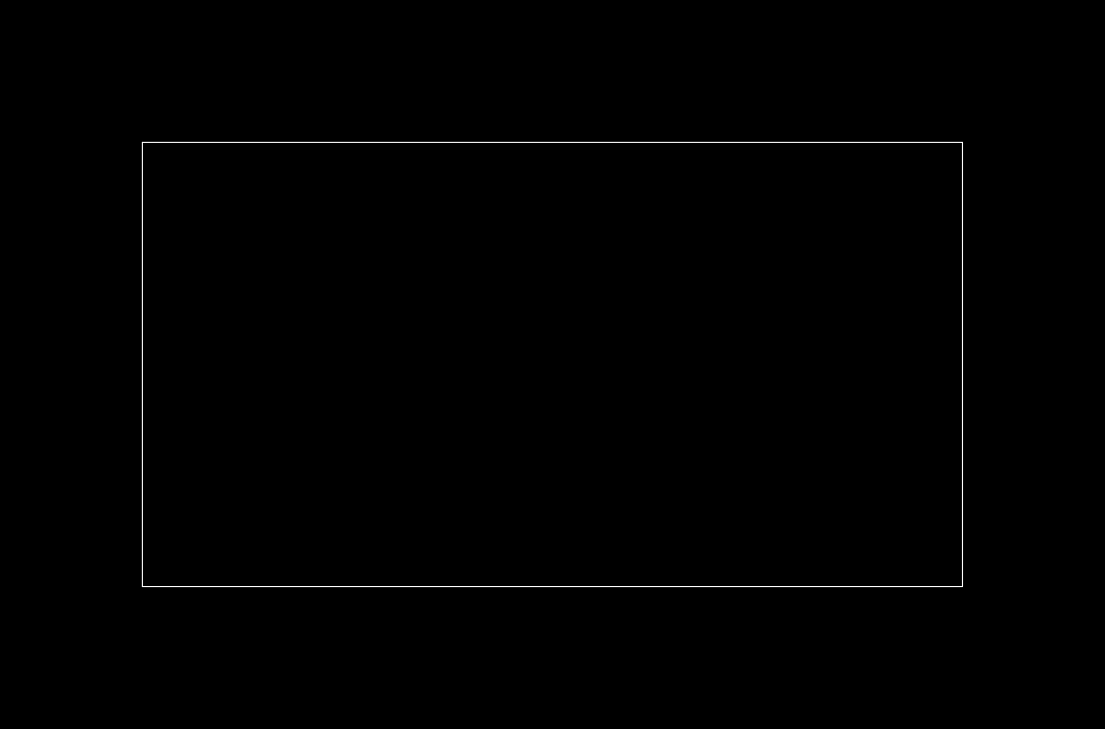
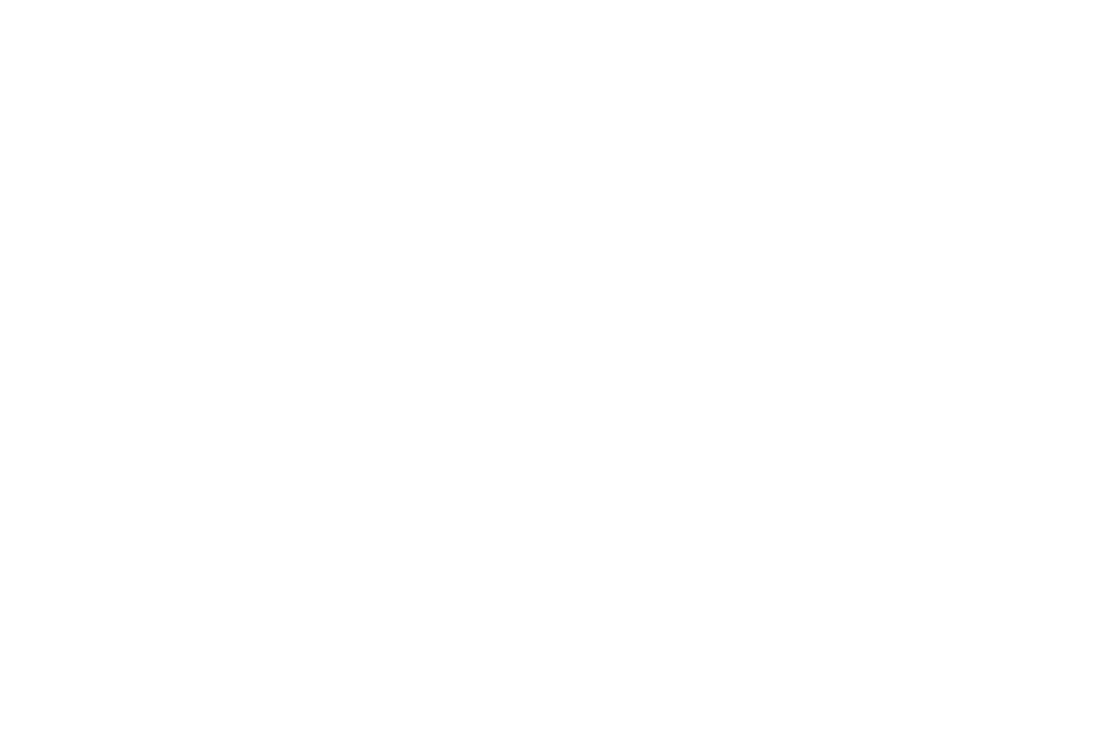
board edge: (962, 142) (142, 142) (142, 586) (962, 586) (962, 142) -> none

